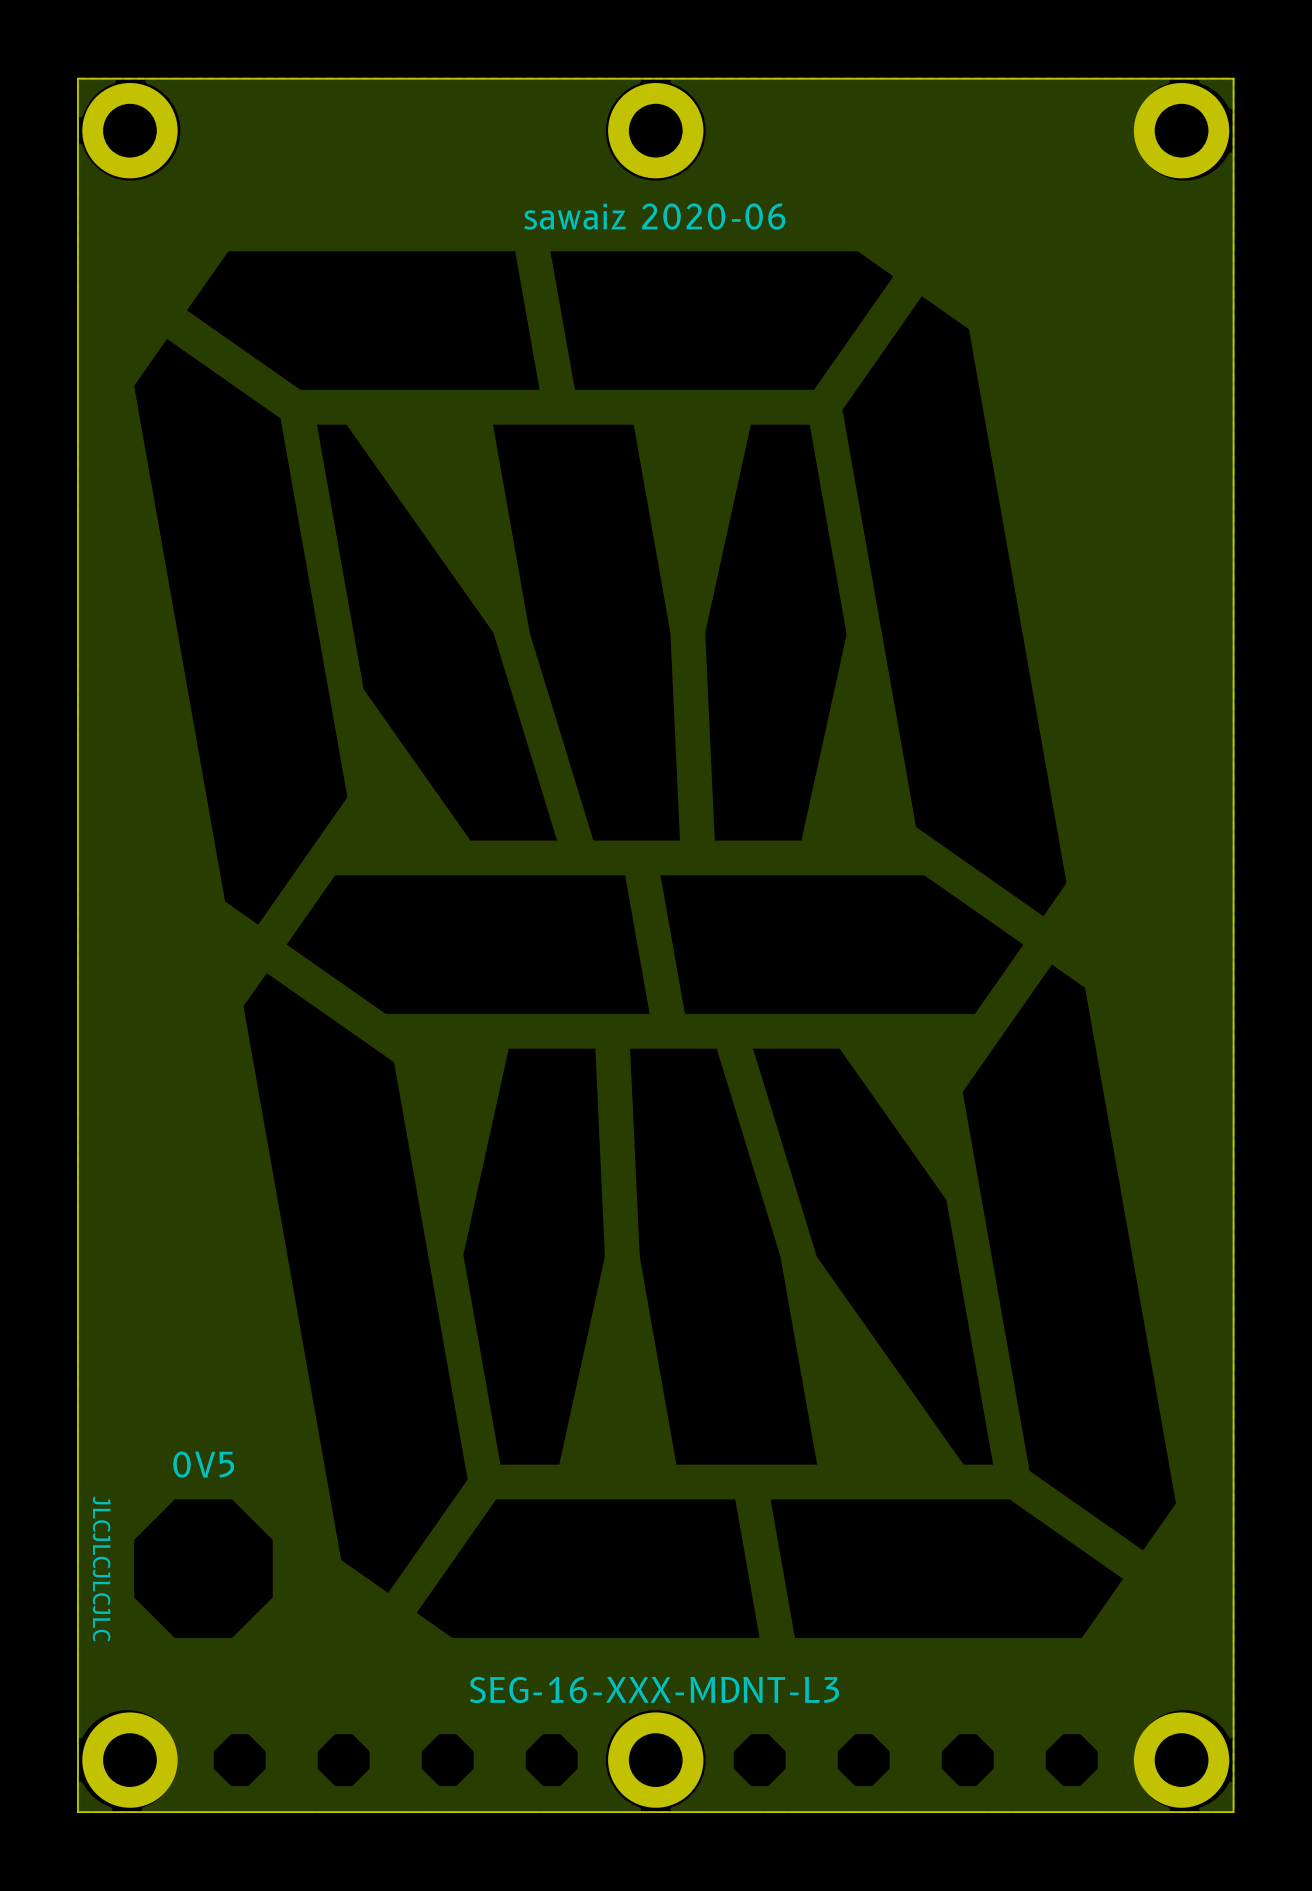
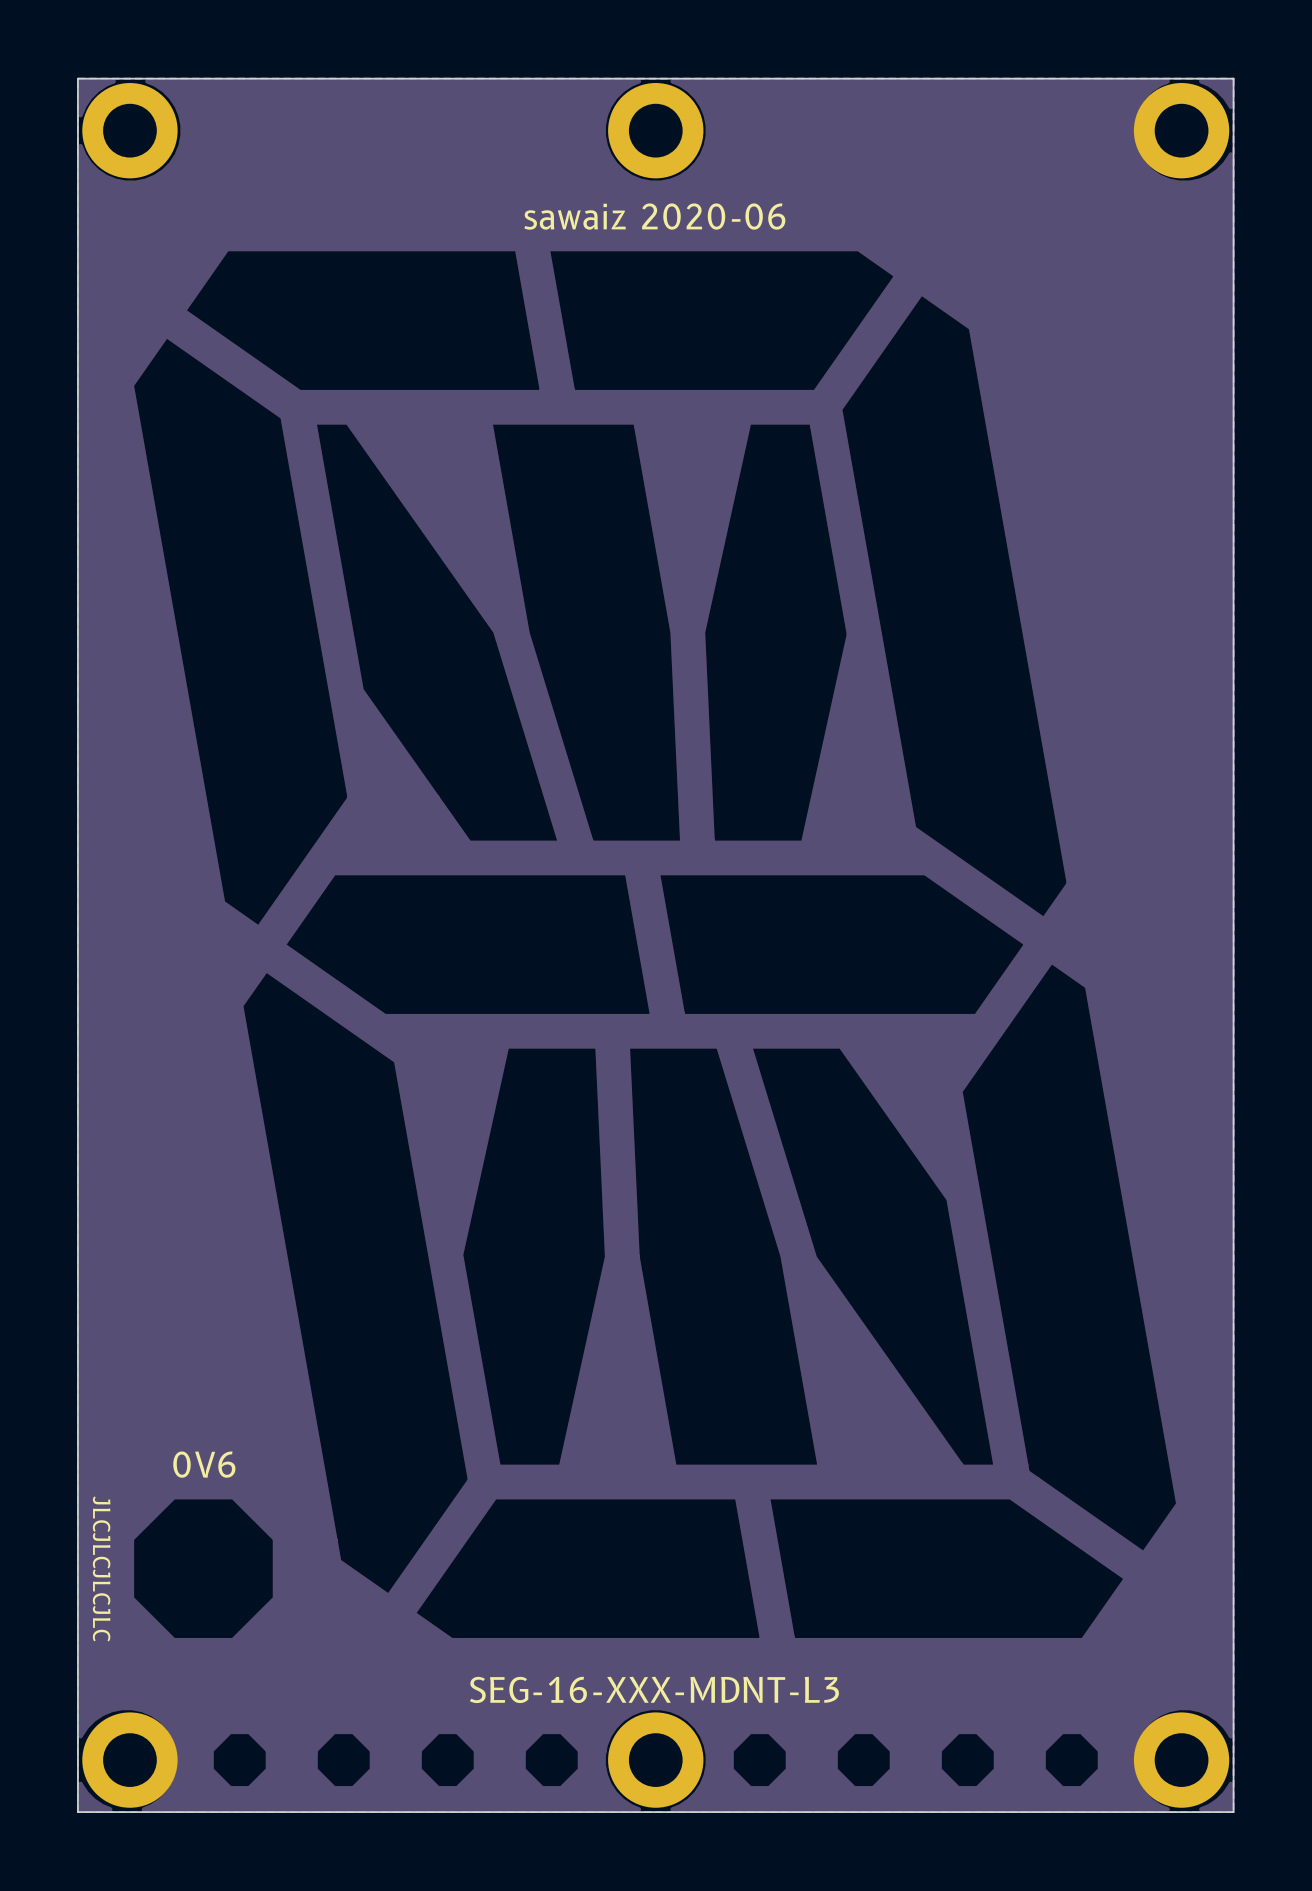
text: 0V5 (203, 1464) -> 0V6 (204, 1464)

